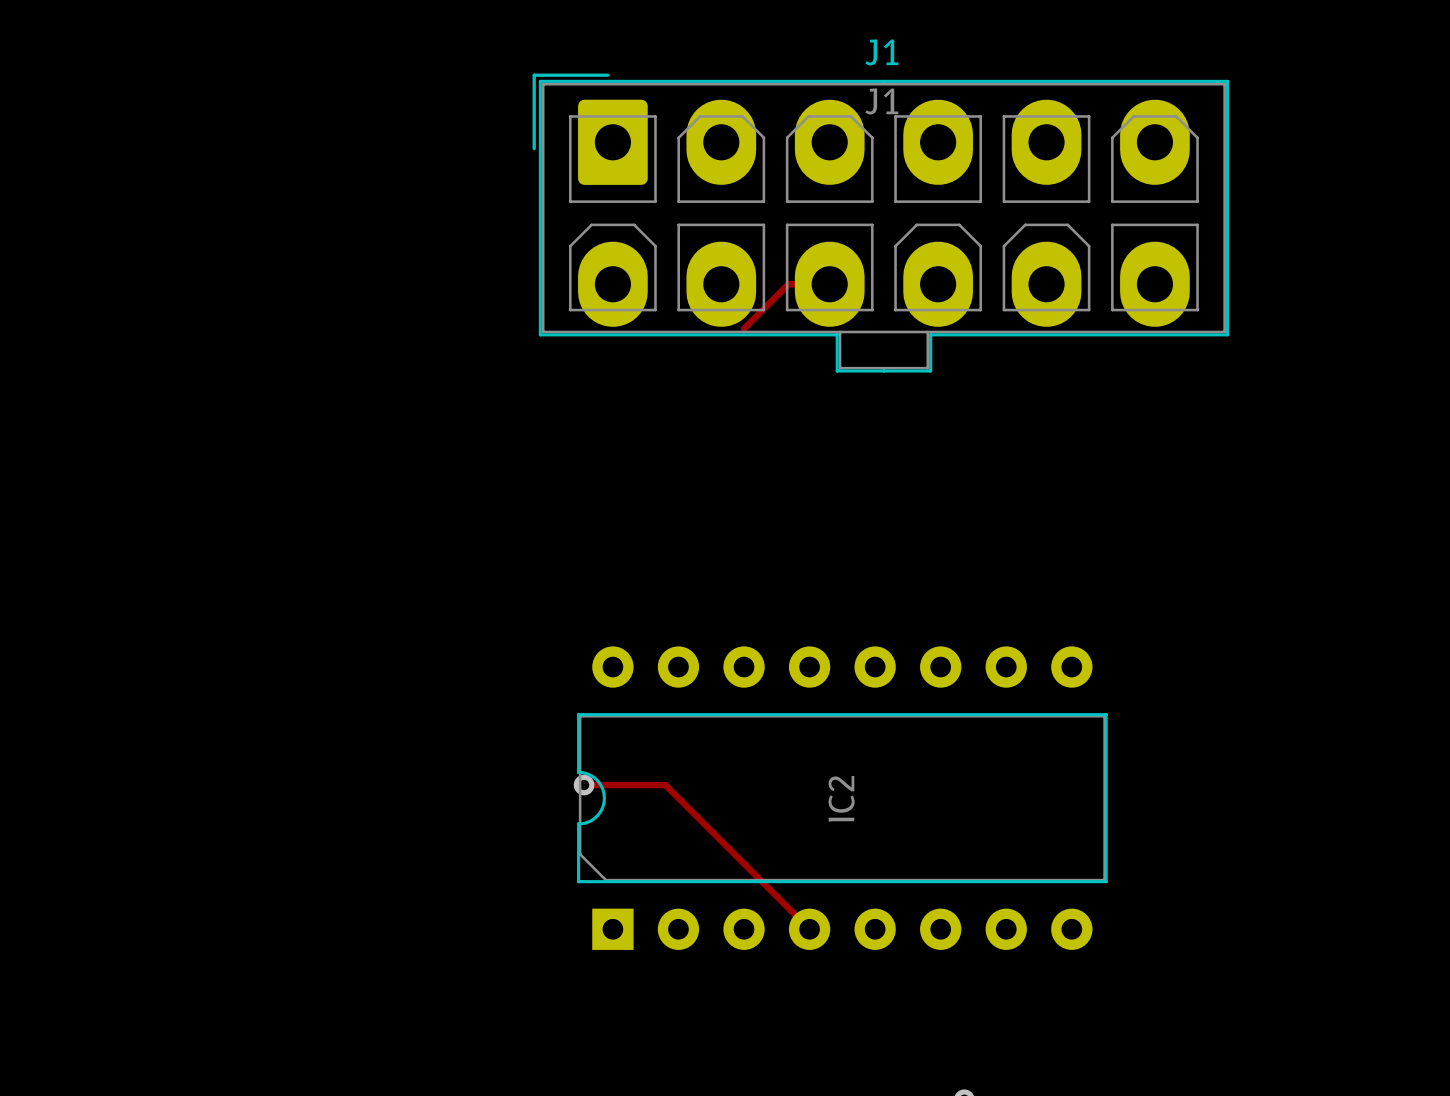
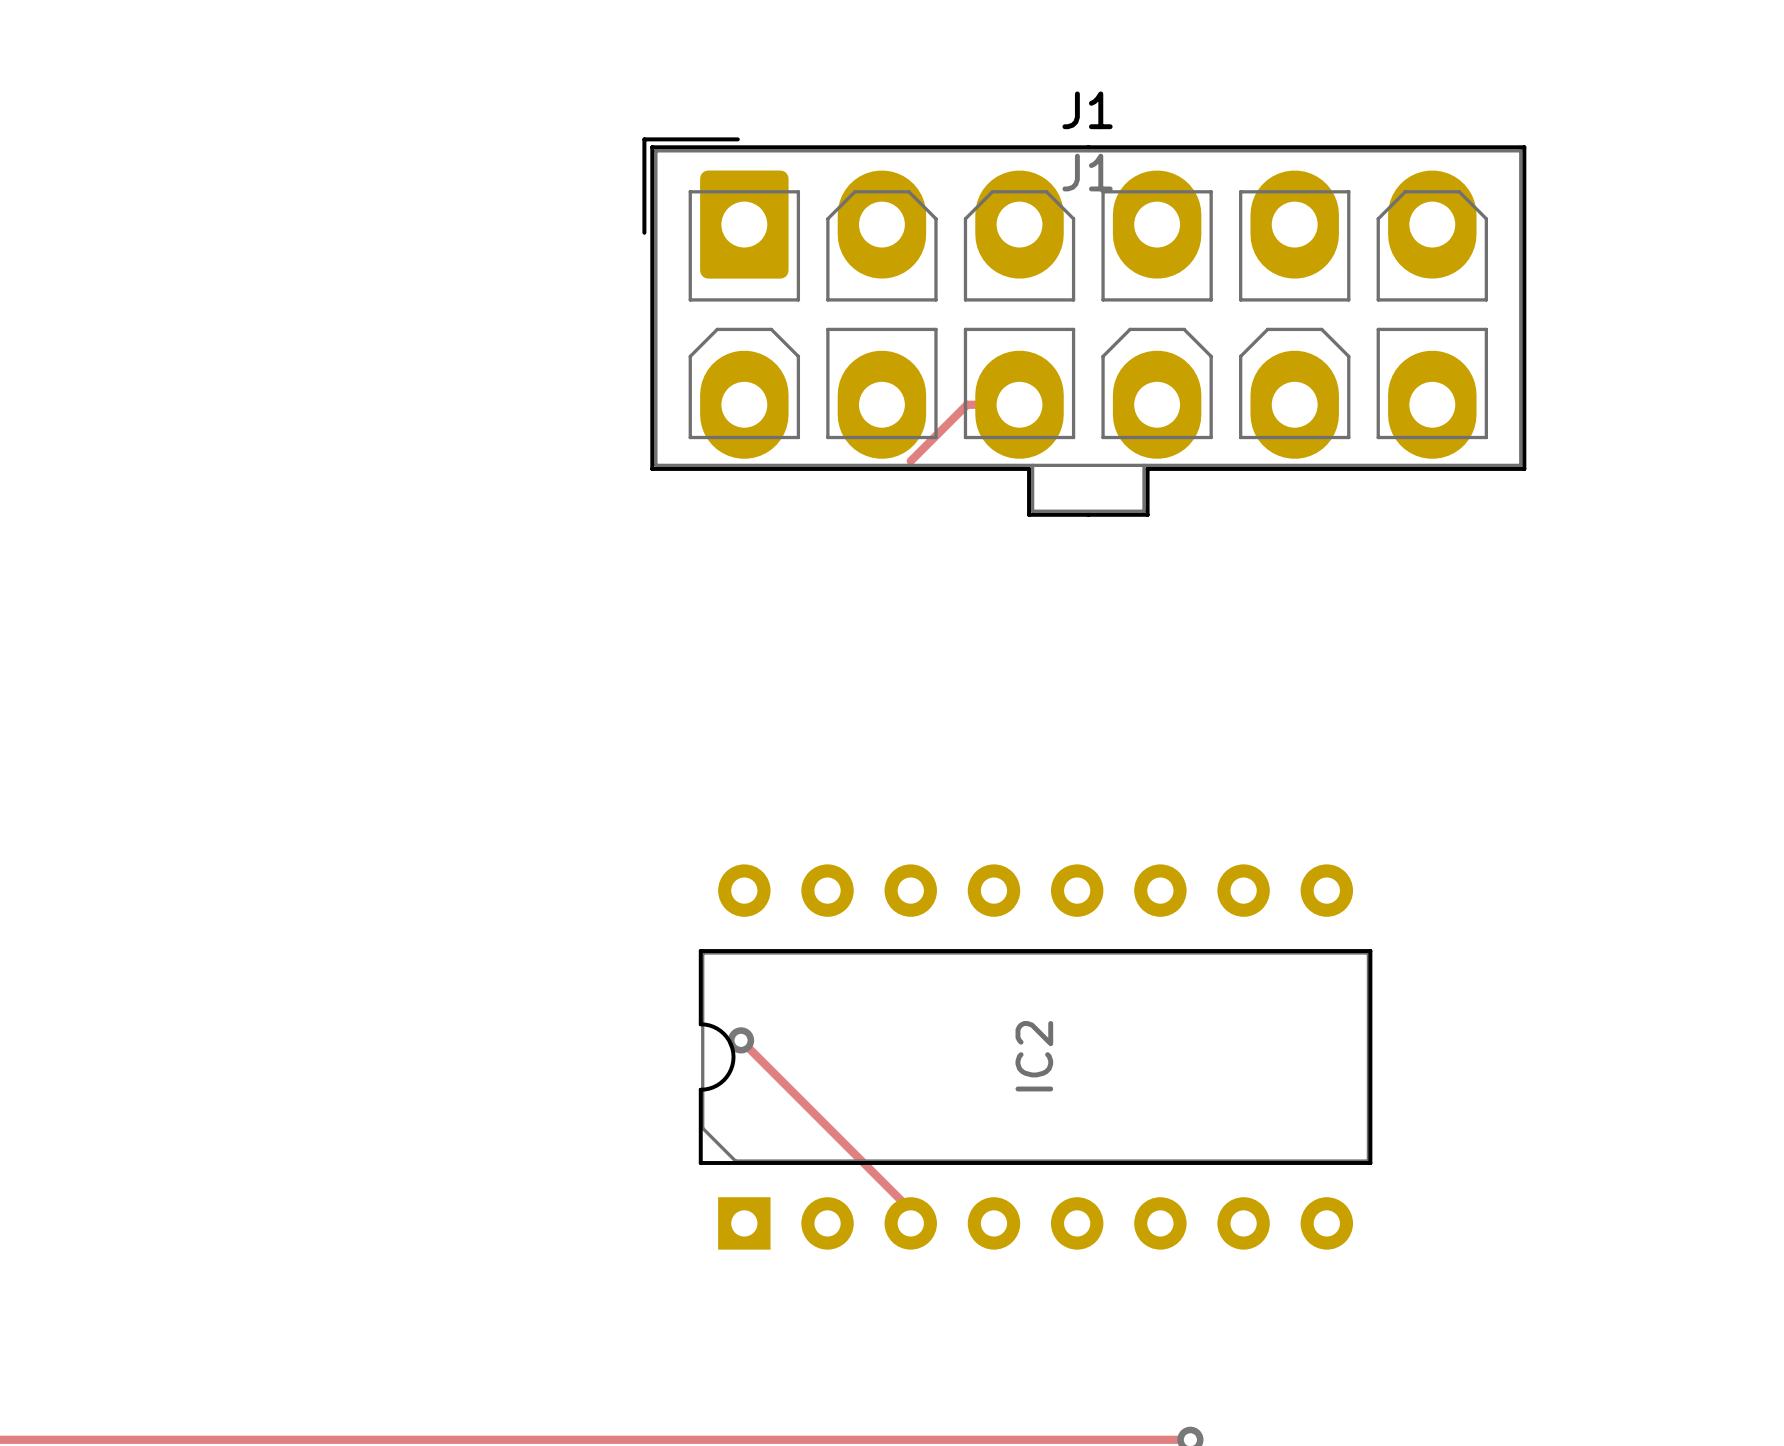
track: (584, 785) (665, 785) (809, 929) -> none
via position: (584, 785) -> (741, 1040)
track: none -> (741, 1040) (910, 1210)

